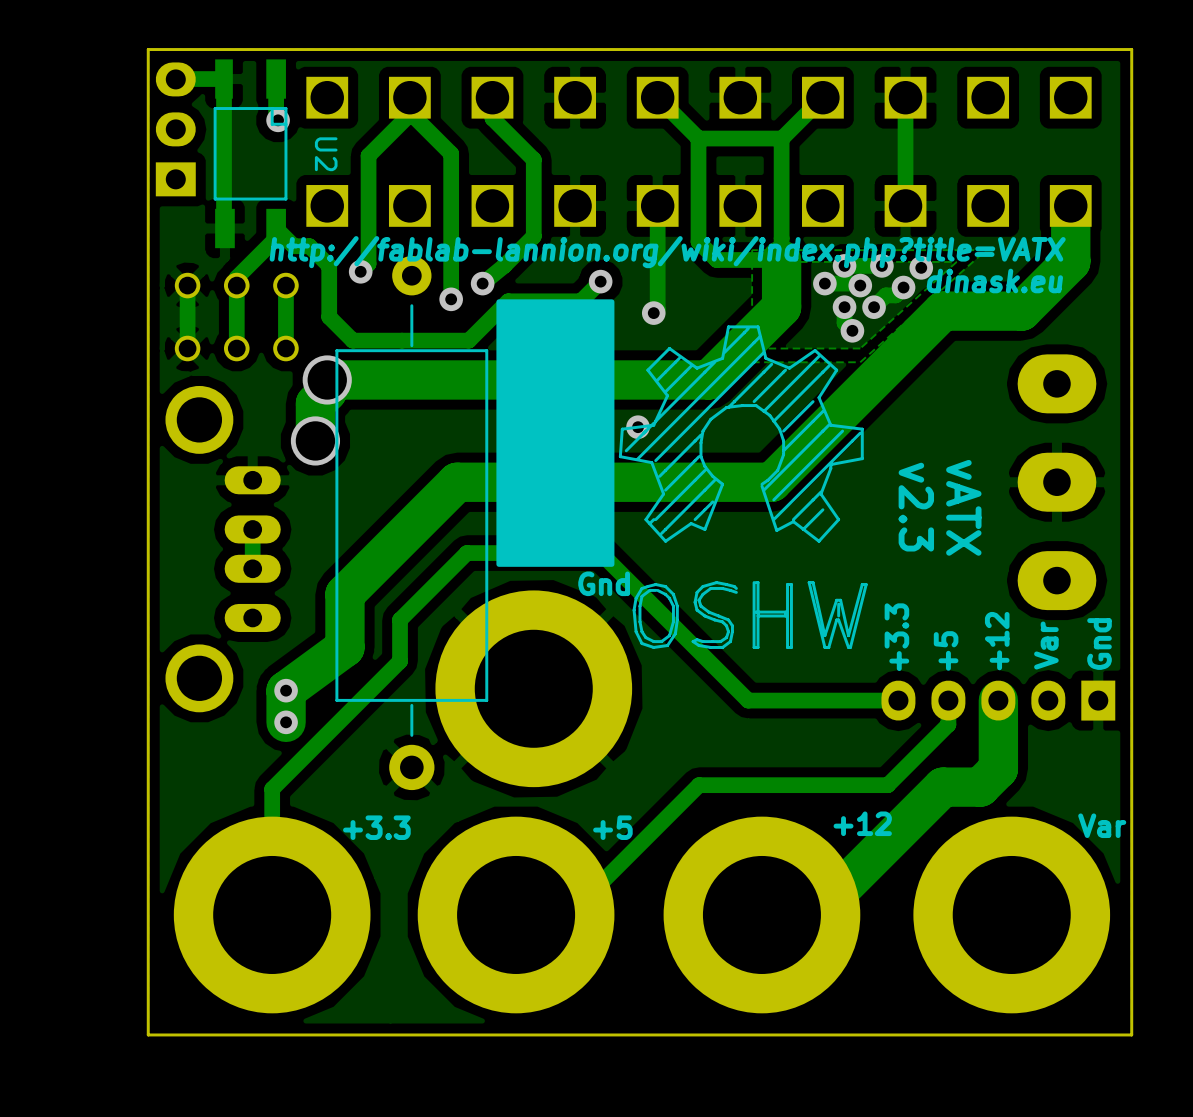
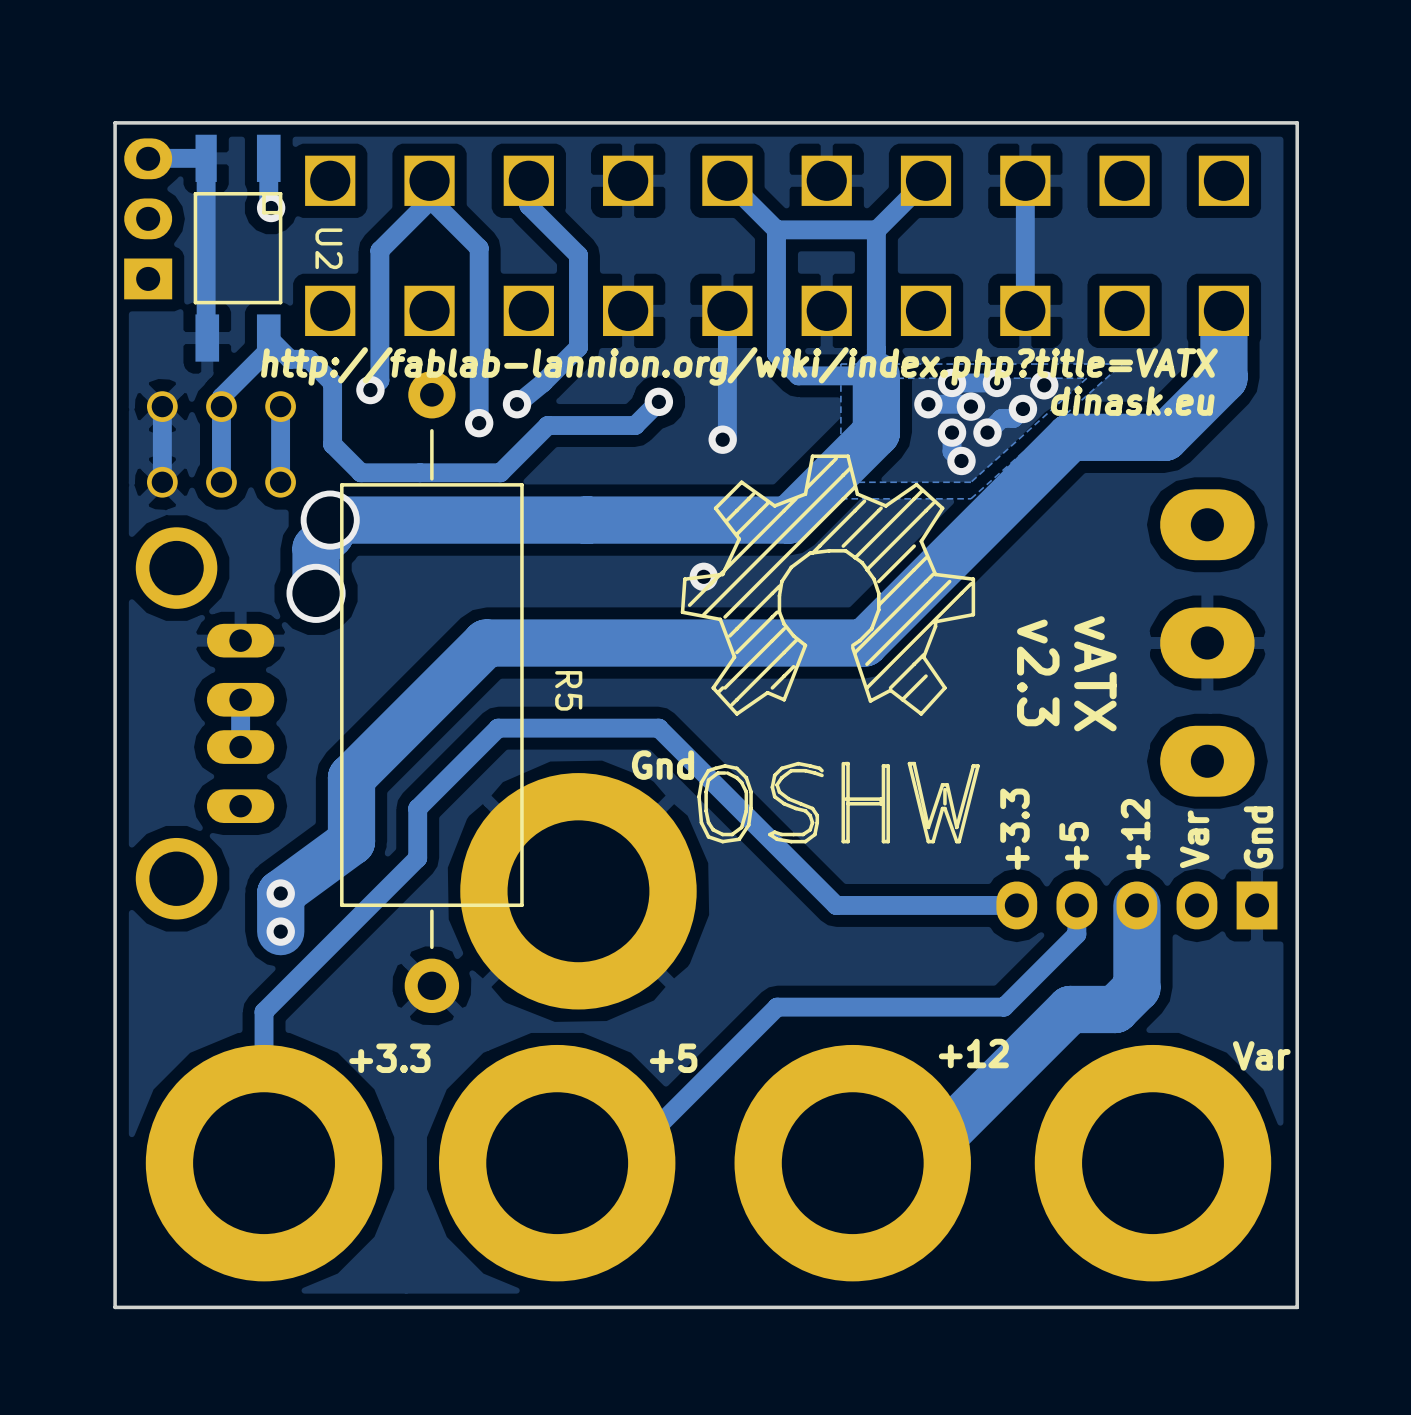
drawing: [496, 299, 615, 567] -> none
R5 name: none -> R5 (568, 690)

